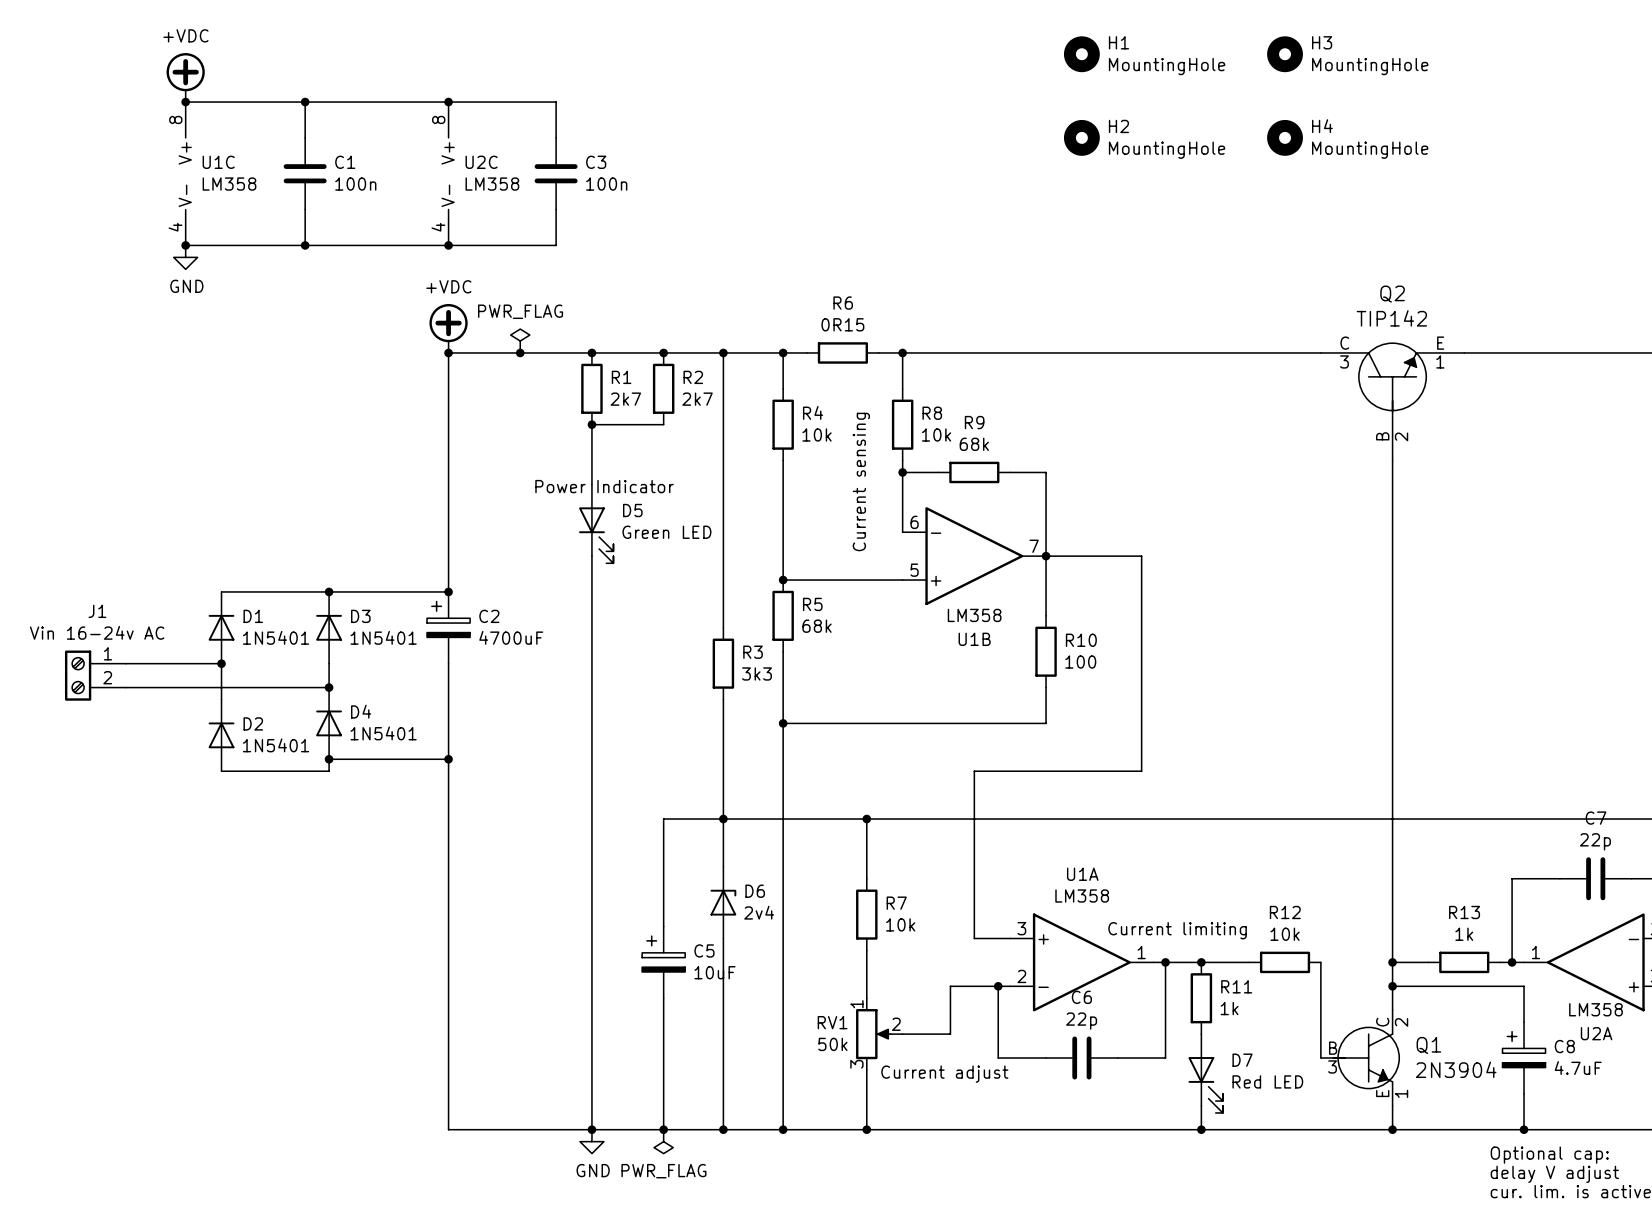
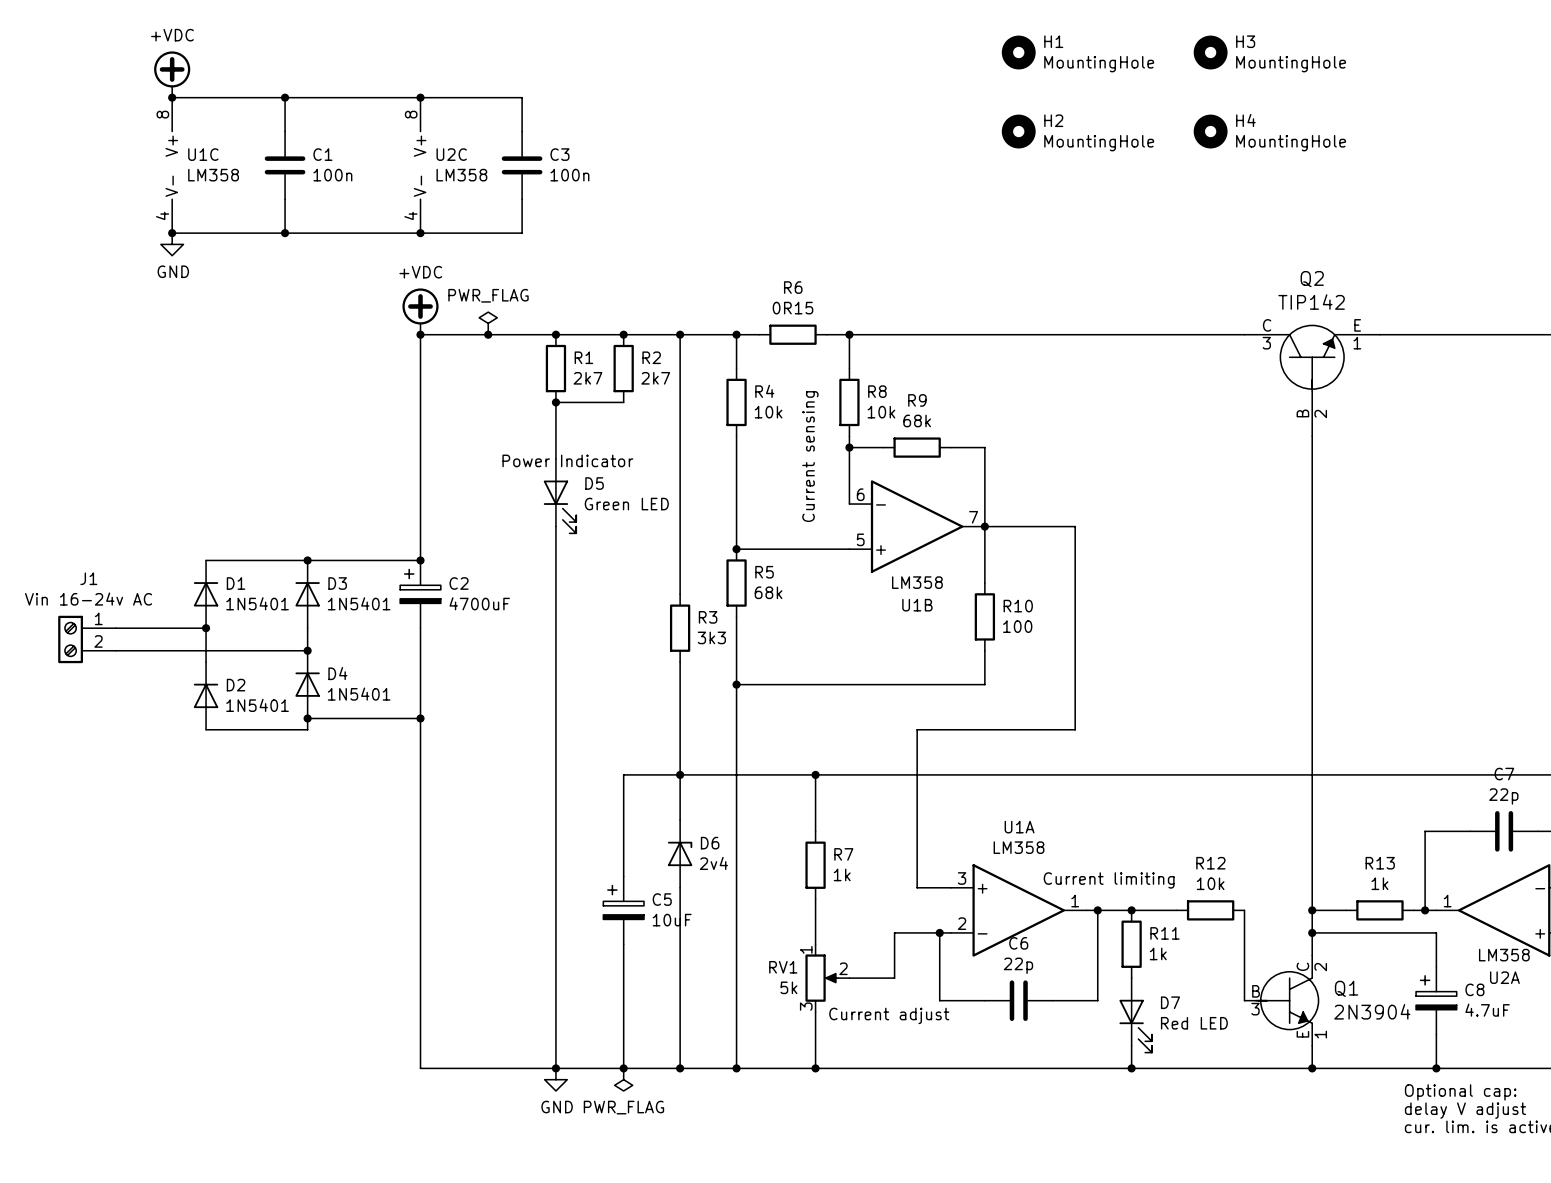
R7 value: 10k (900, 924) -> 1k (842, 874)
RV1 value: 50k (832, 1044) -> 5k (788, 987)

